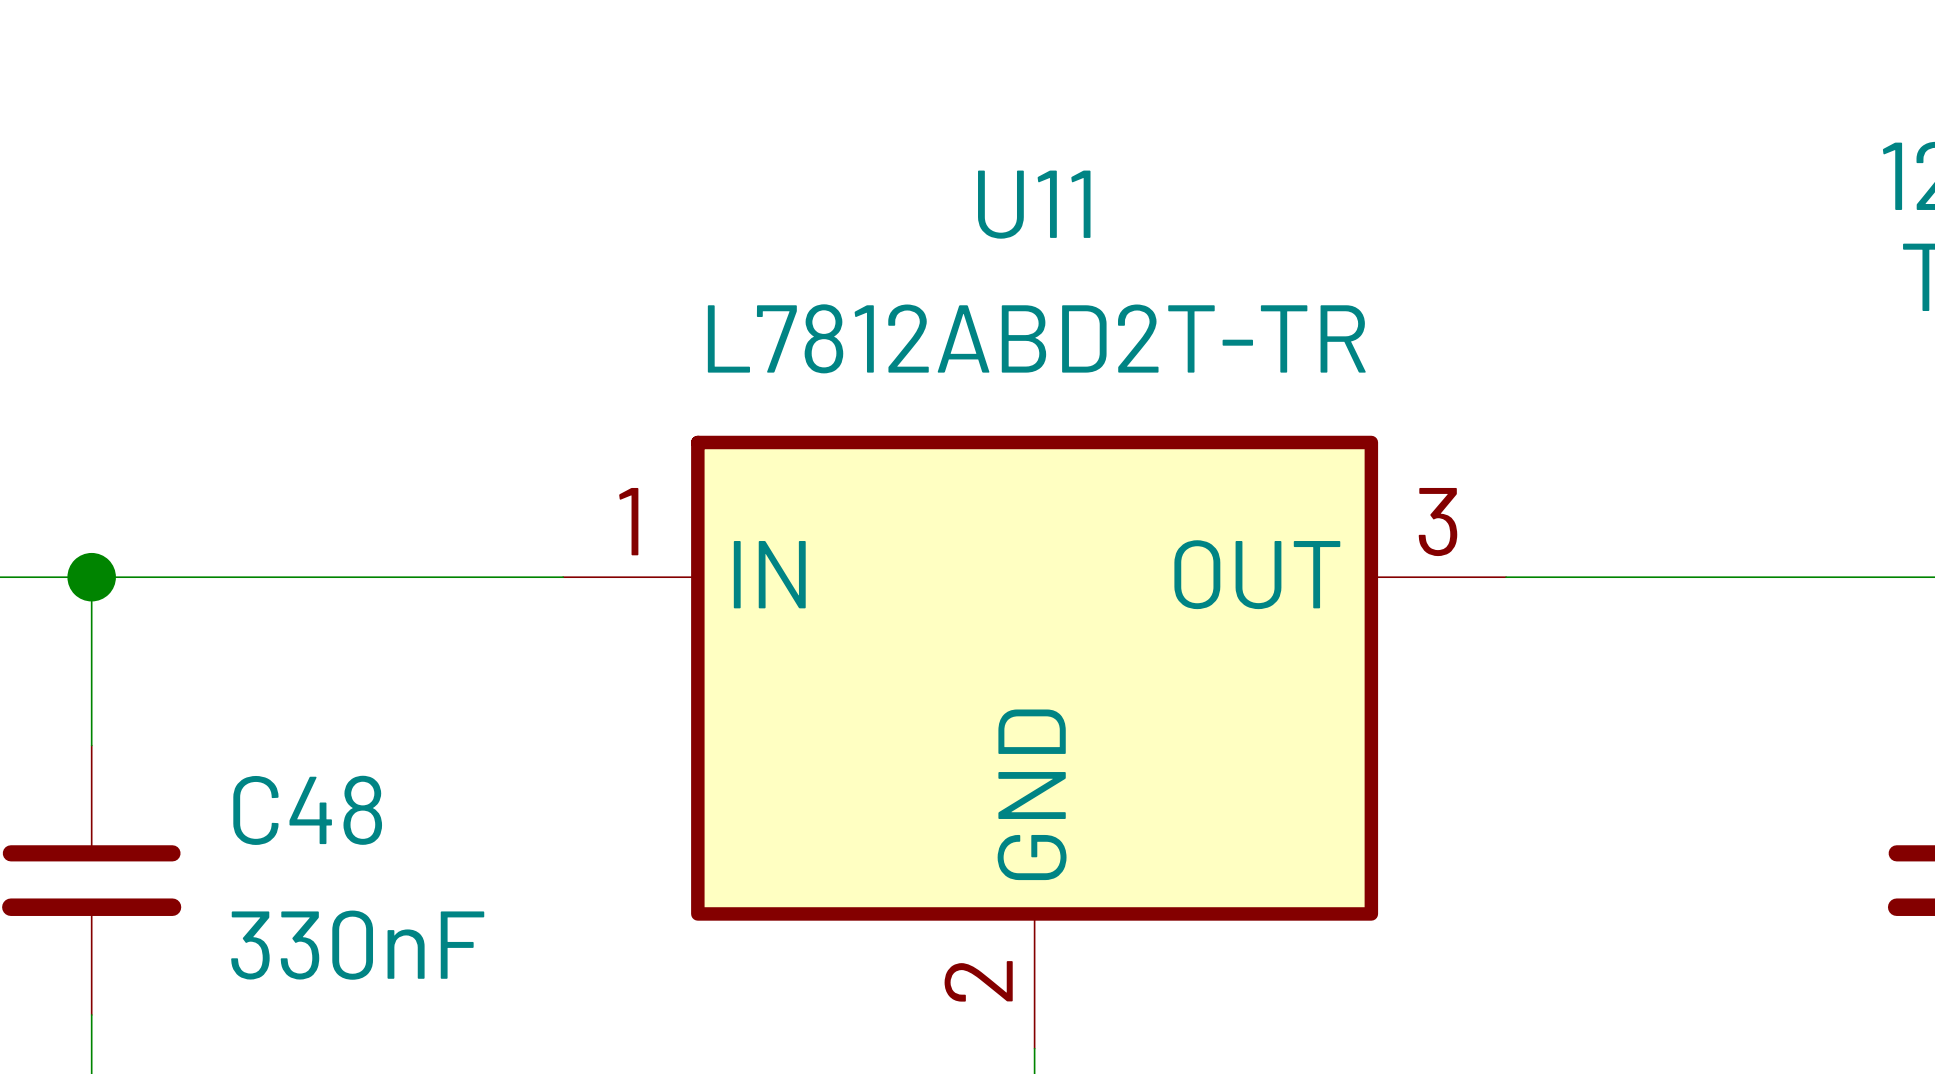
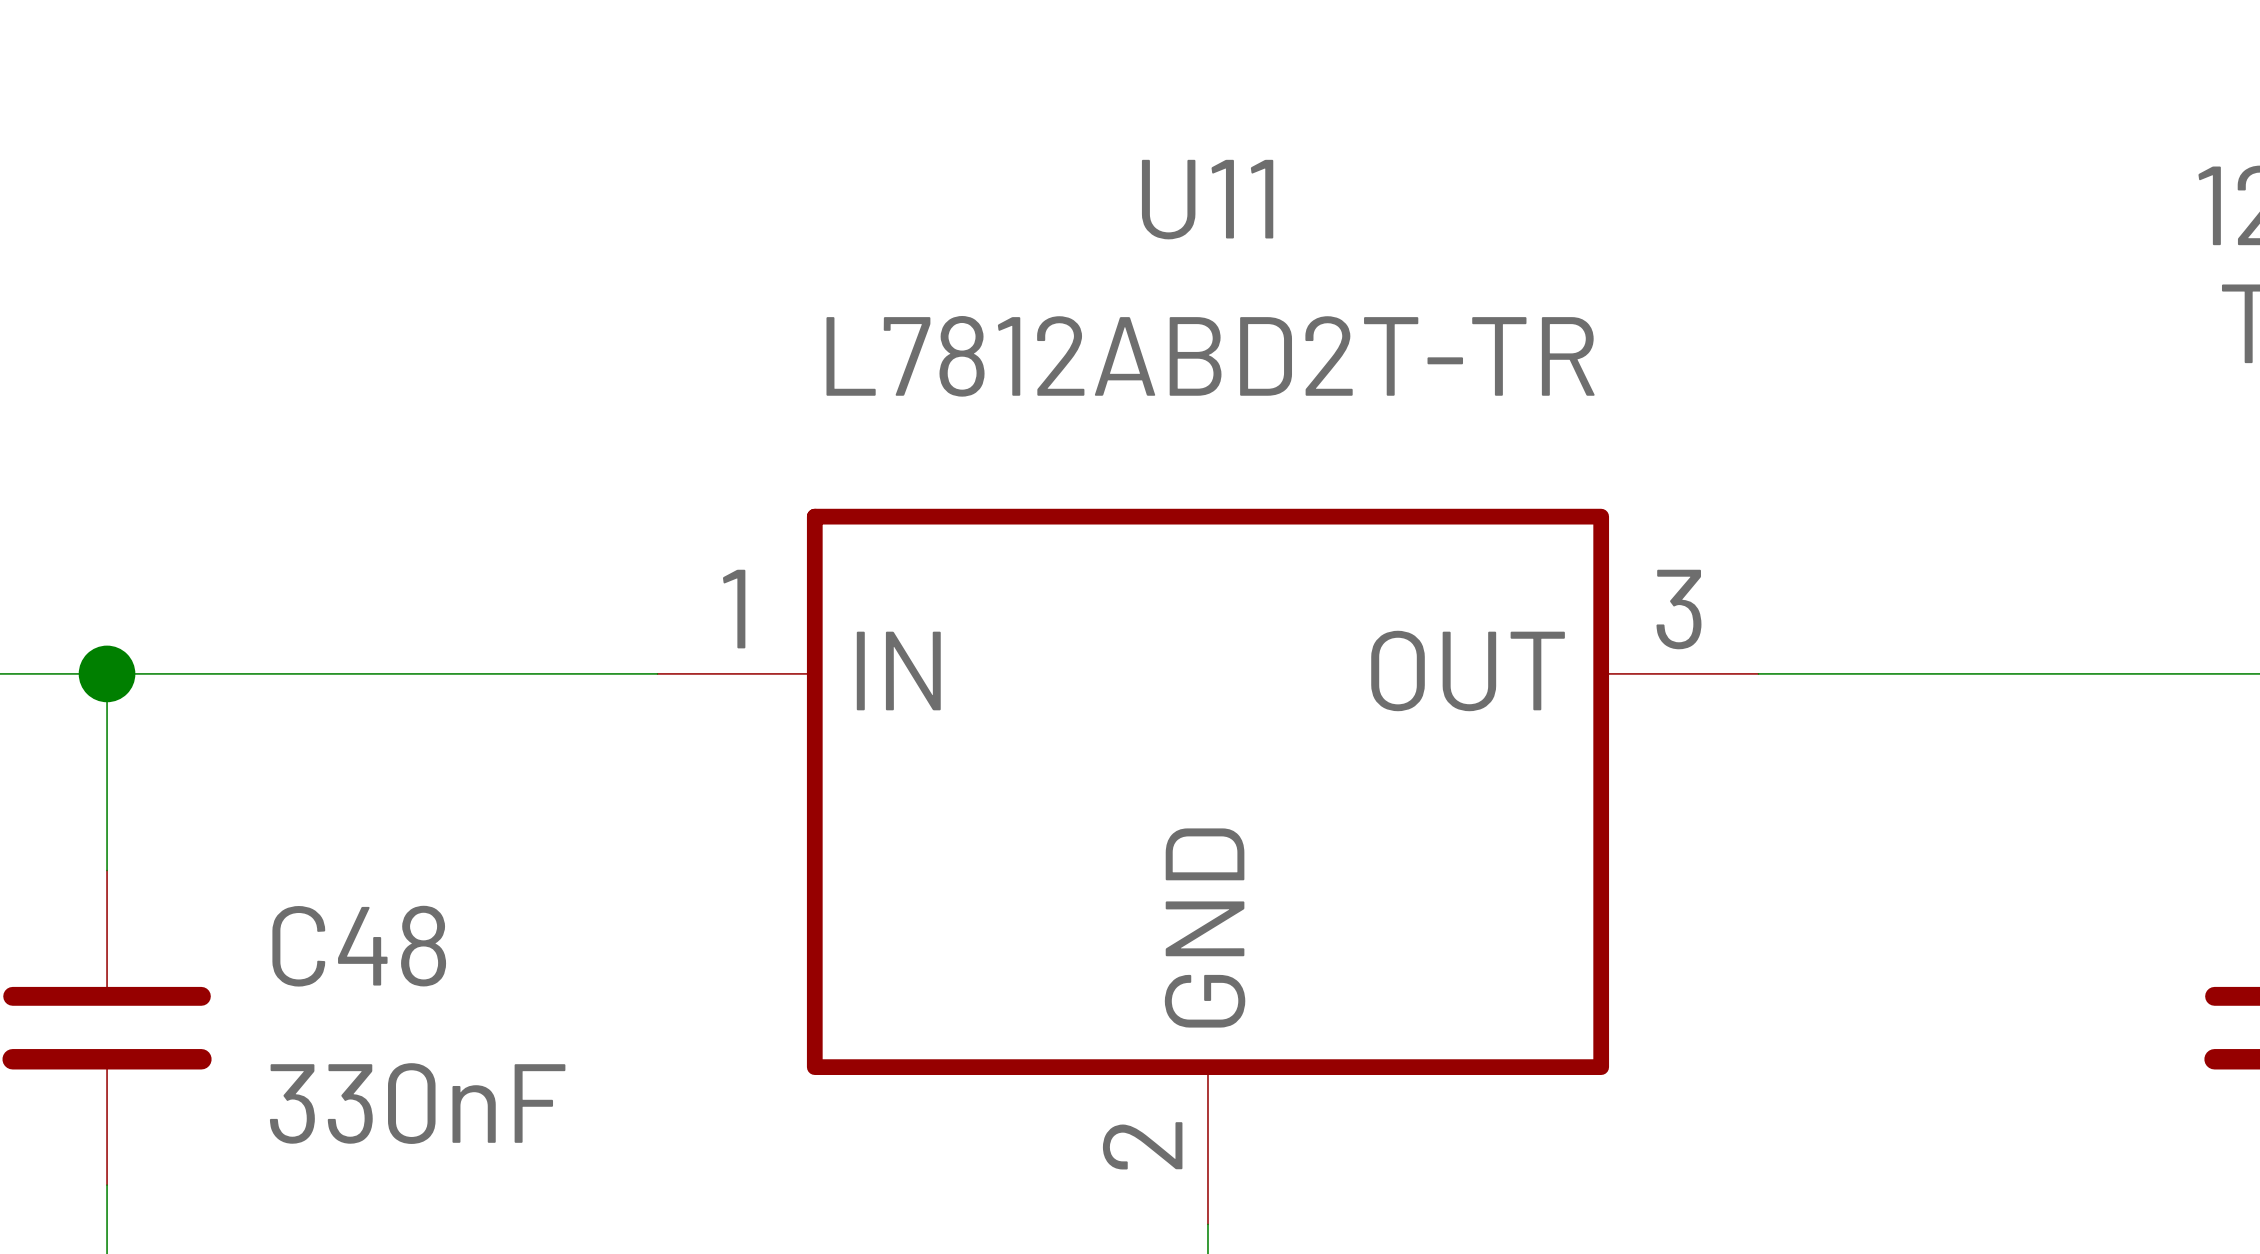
U11 name position: U11 (1034, 204) -> U11 (1207, 199)
U11 value position: L7812ABD2T-TR (1036, 338) -> L7812ABD2T-TR (1210, 356)

